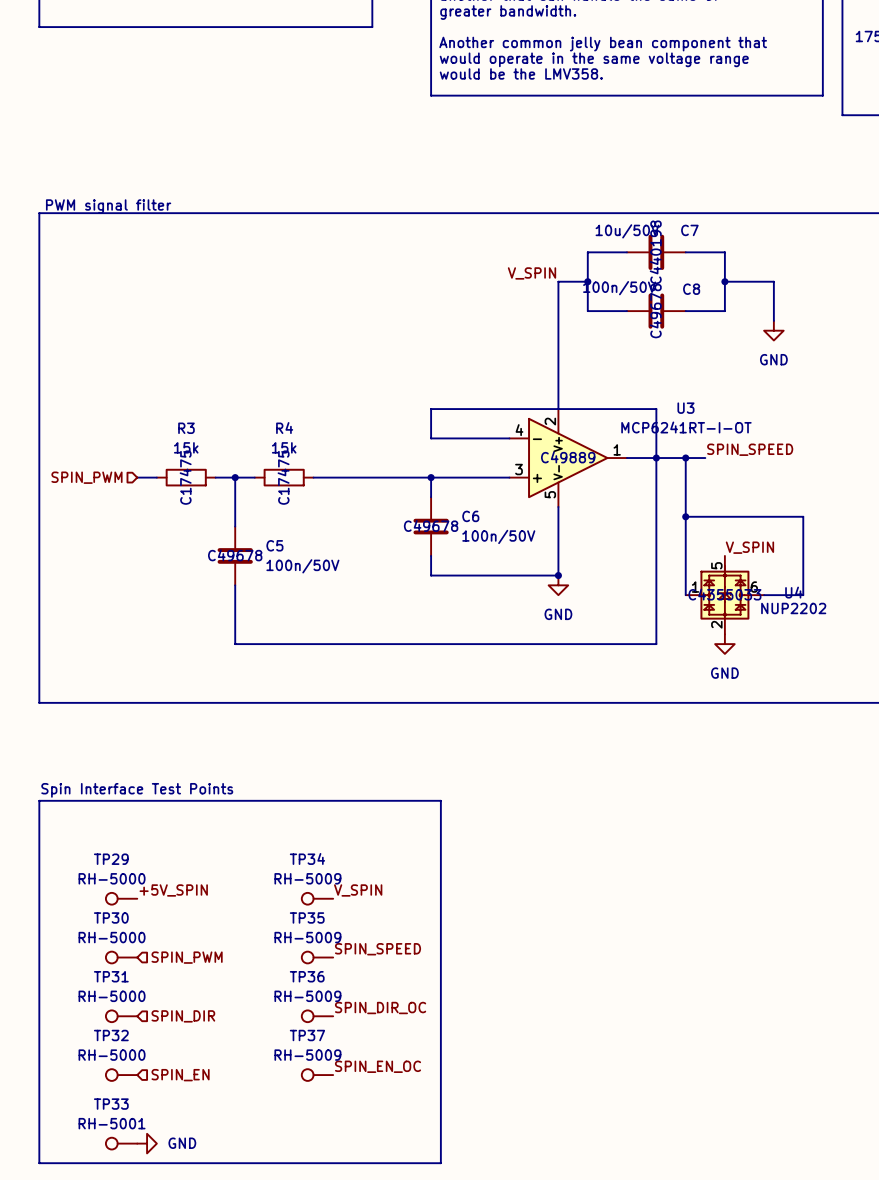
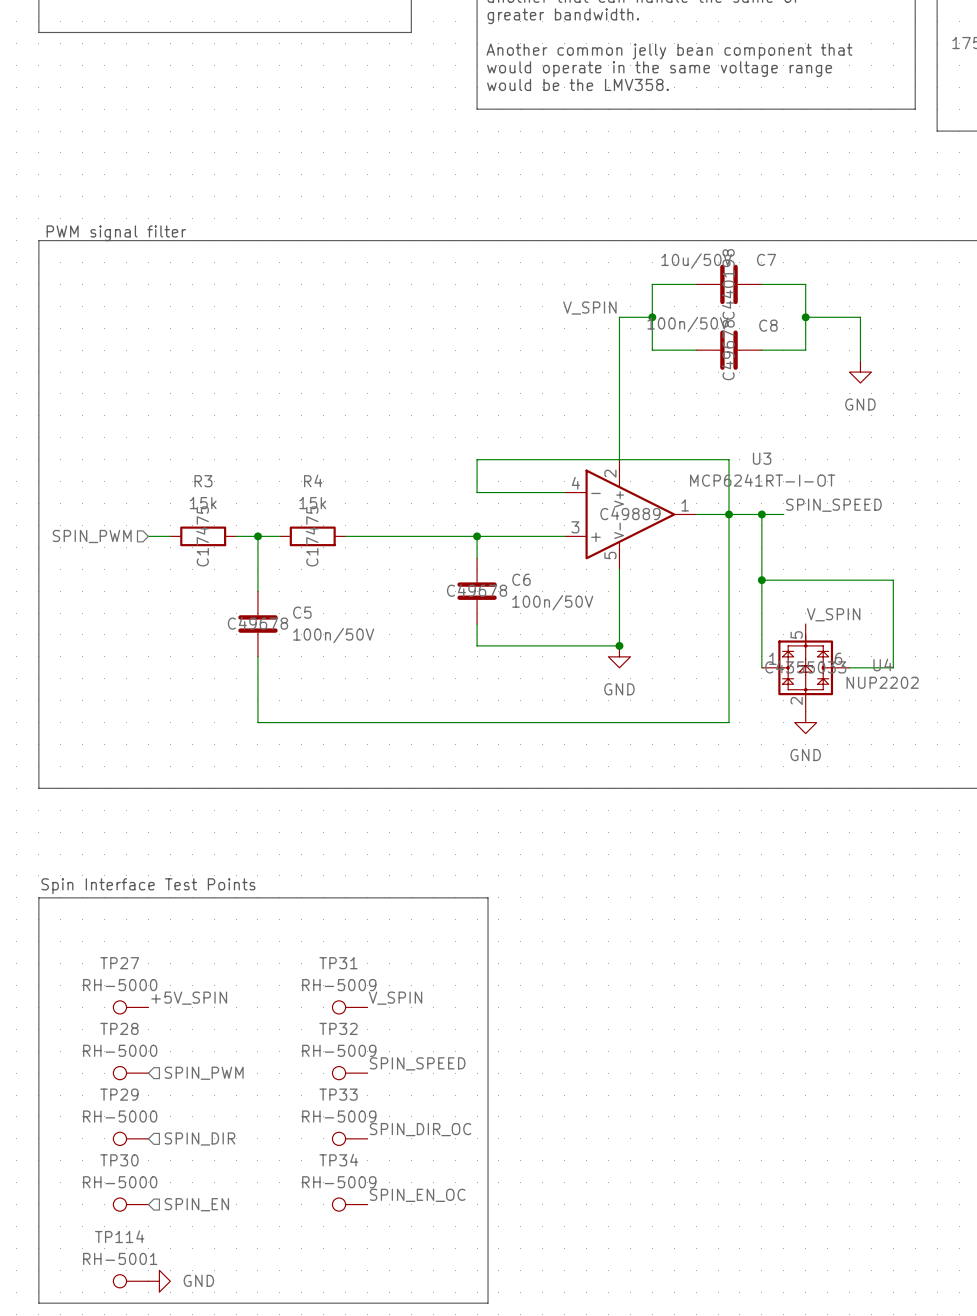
TP34 name: TP34 (307, 858) -> TP31 (338, 963)
TP29 name: TP29 (111, 859) -> TP27 (119, 963)
TP30 name: TP30 (111, 917) -> TP28 (119, 1028)
TP35 name: TP35 (307, 917) -> TP32 (338, 1028)
TP31 name: TP31 (111, 976) -> TP29 (119, 1094)
TP36 name: TP36 (307, 976) -> TP33 (338, 1094)
TP32 name: TP32 (111, 1035) -> TP30 (119, 1160)
TP37 name: TP37 (307, 1035) -> TP34 (338, 1160)
TP33 name: TP33 (111, 1104) -> TP114 (119, 1236)

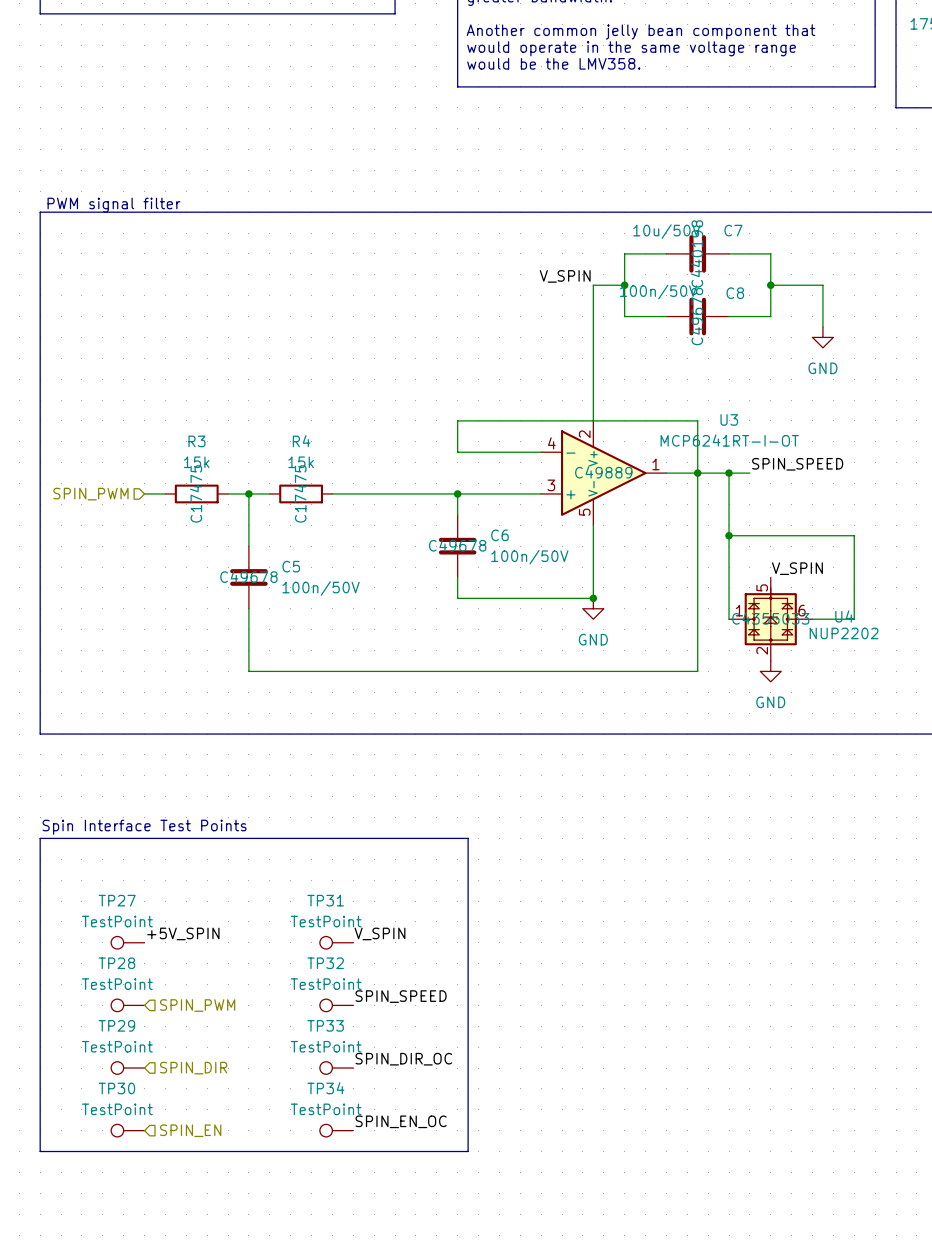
TP27 value: RH-5000 (120, 985) -> TestPoint (117, 921)
TP31 value: RH-5009 (339, 985) -> TestPoint (326, 921)
TP28 value: RH-5000 (120, 1050) -> TestPoint (117, 984)
TP32 value: RH-5009 (339, 1050) -> TestPoint (326, 984)
TP29 value: RH-5000 (120, 1116) -> TestPoint (117, 1046)
TP33 value: RH-5009 (339, 1116) -> TestPoint (326, 1046)
TP30 value: RH-5000 (120, 1182) -> TestPoint (117, 1109)
TP34 value: RH-5009 (339, 1182) -> TestPoint (326, 1109)
line: (38, 1226) (38, 1303) (488, 1303) (488, 1226) -> (40, 1151) (468, 1151)
TP114: RH-5001 (130, 1281) -> none
power symbol: GND (159, 1281) -> none

